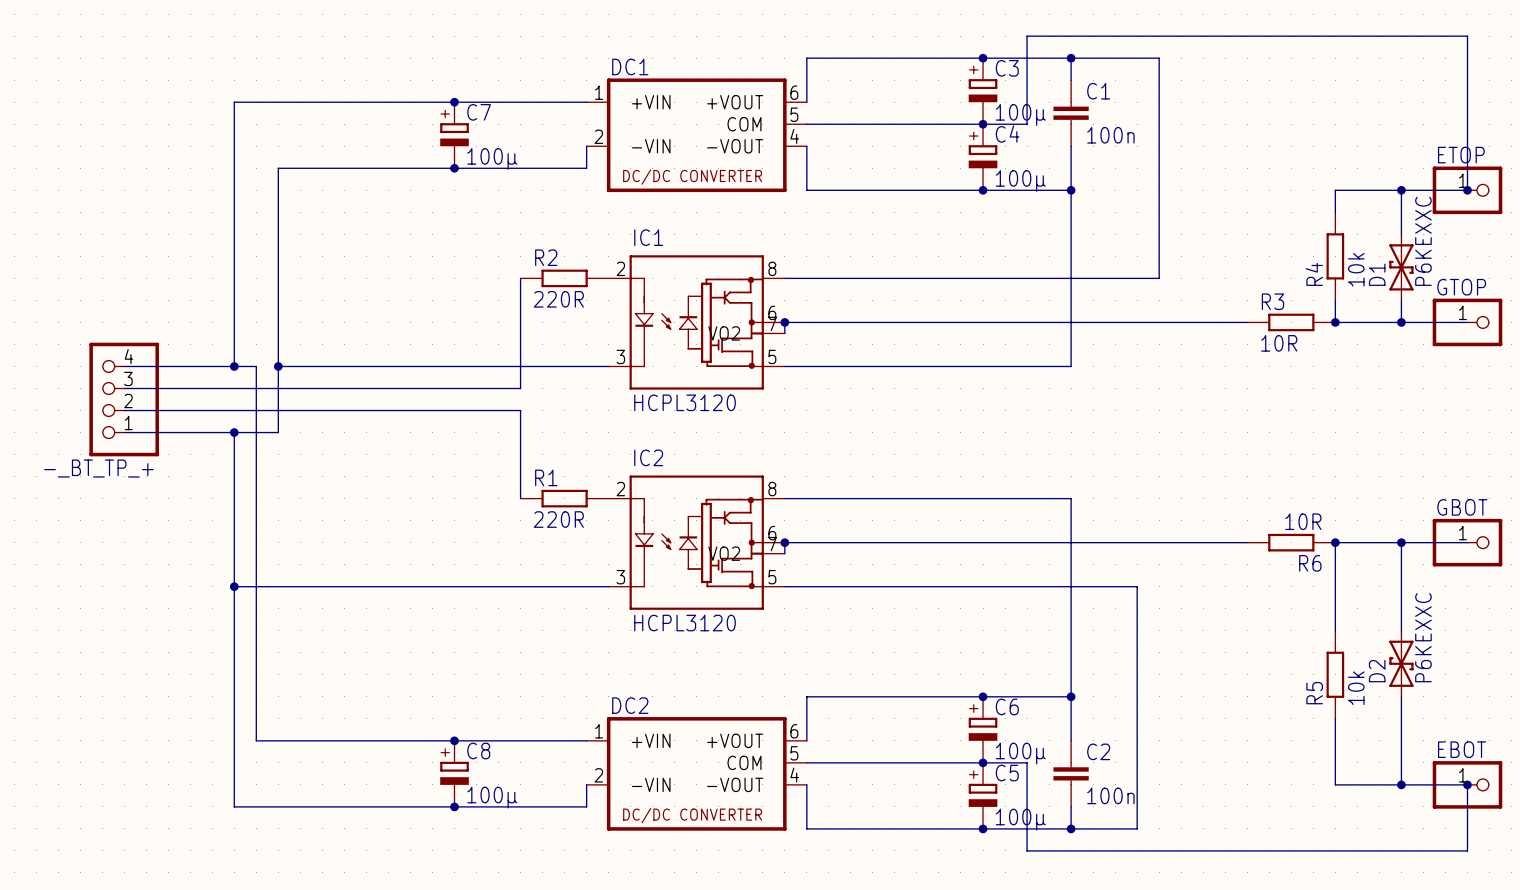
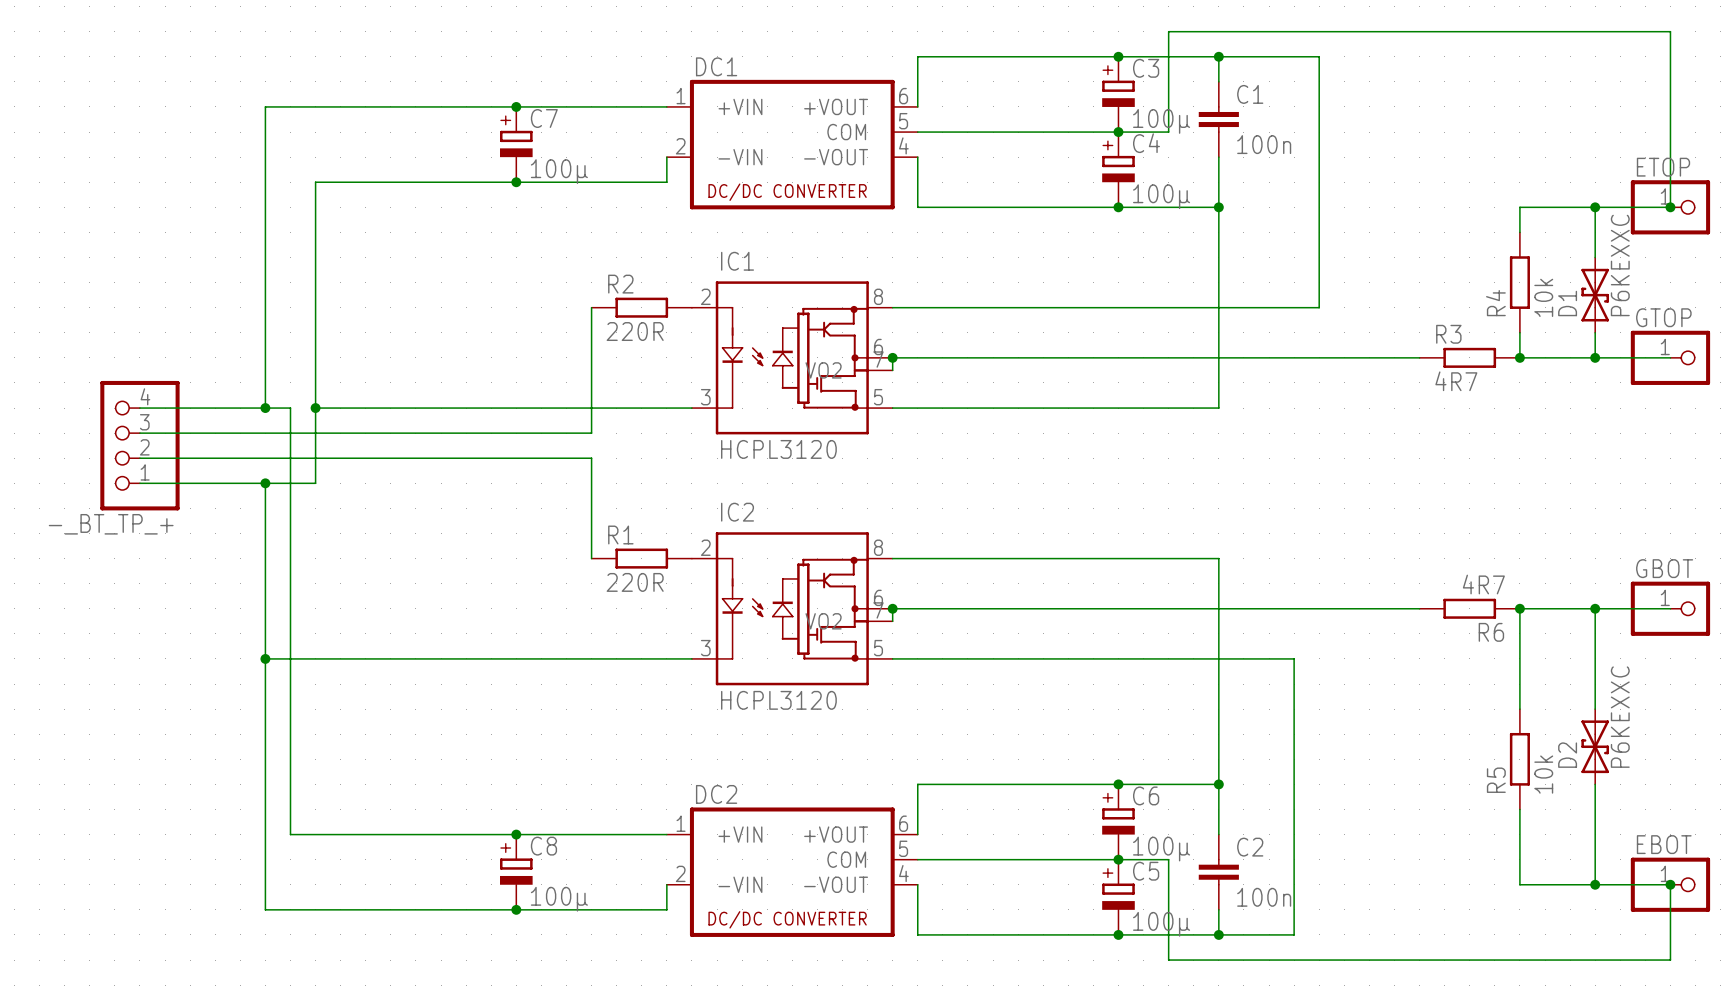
R3 value: 10R (1279, 343) -> 4R7 (1456, 381)
R6 value: 10R (1303, 521) -> 4R7 (1483, 584)

